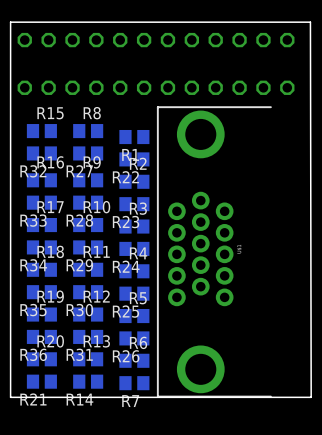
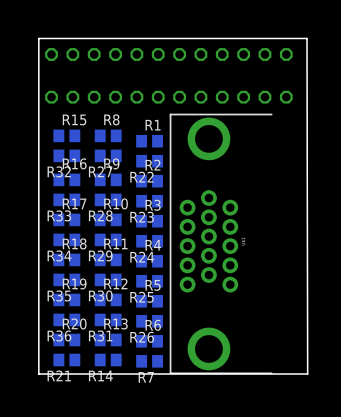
R1 name position: R1 (130, 154) -> R1 (153, 125)

